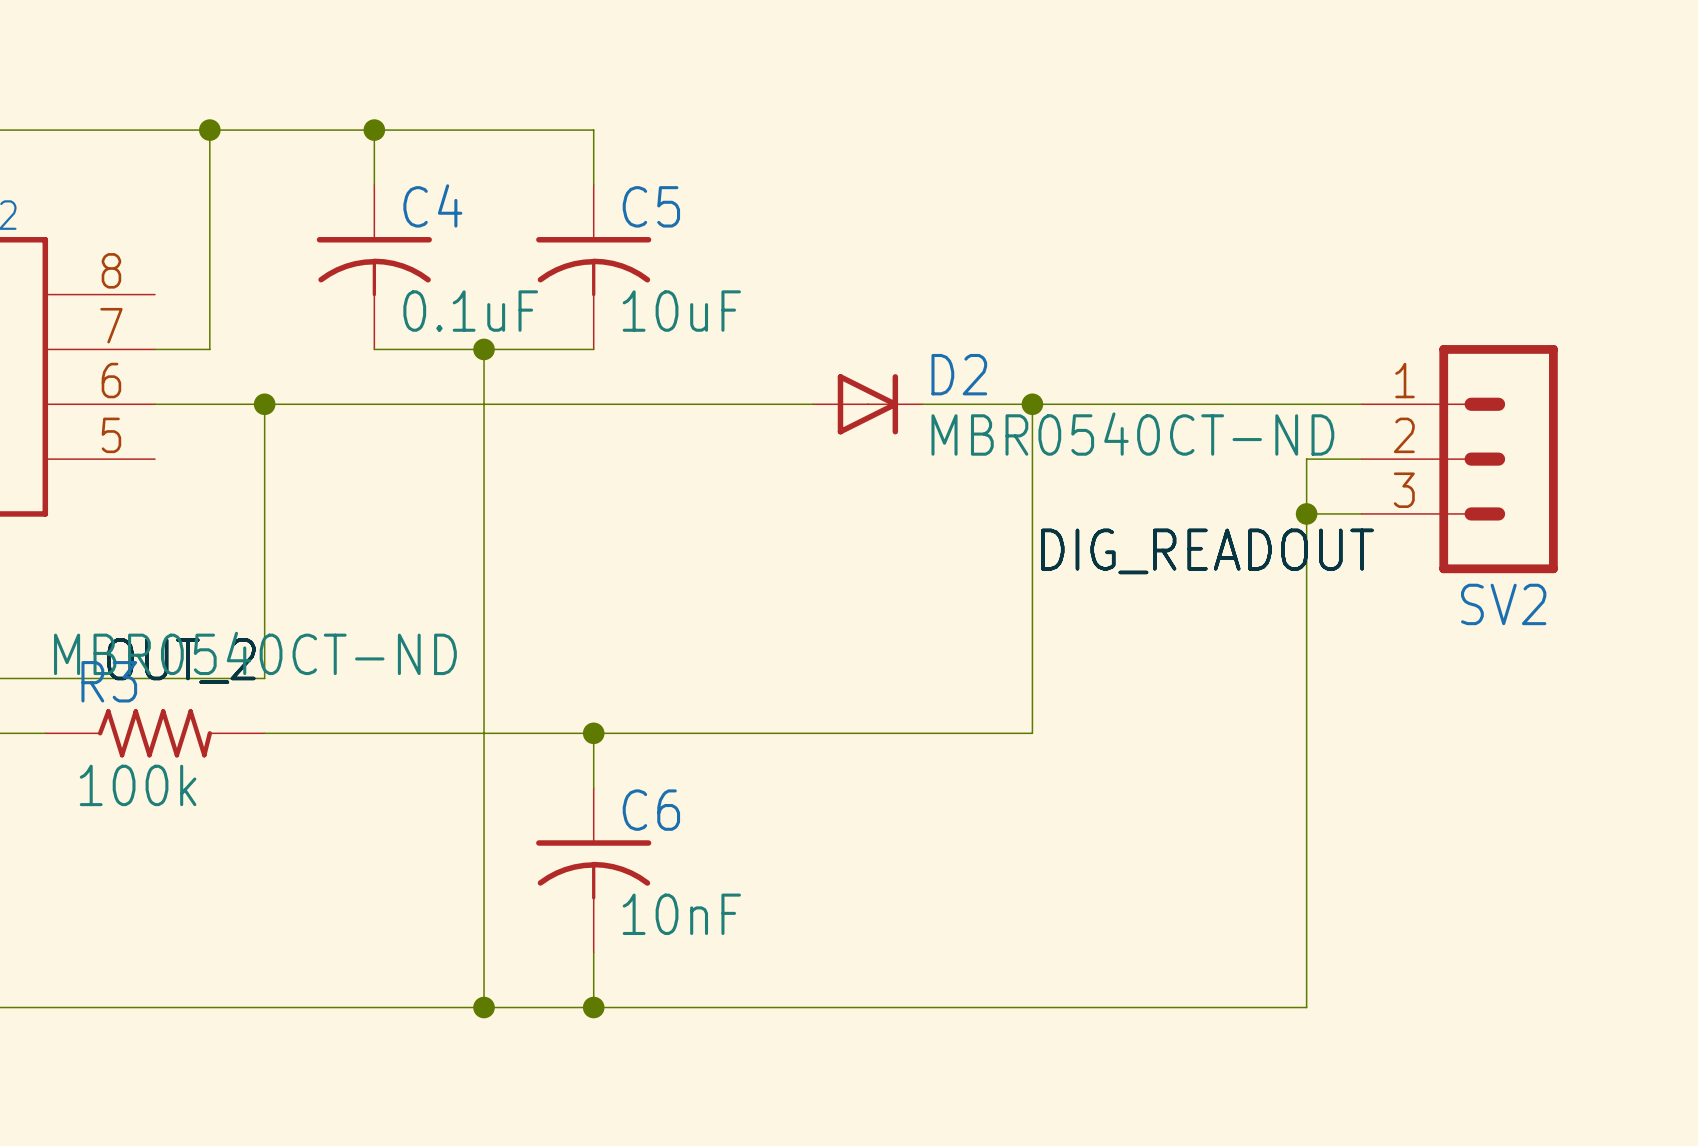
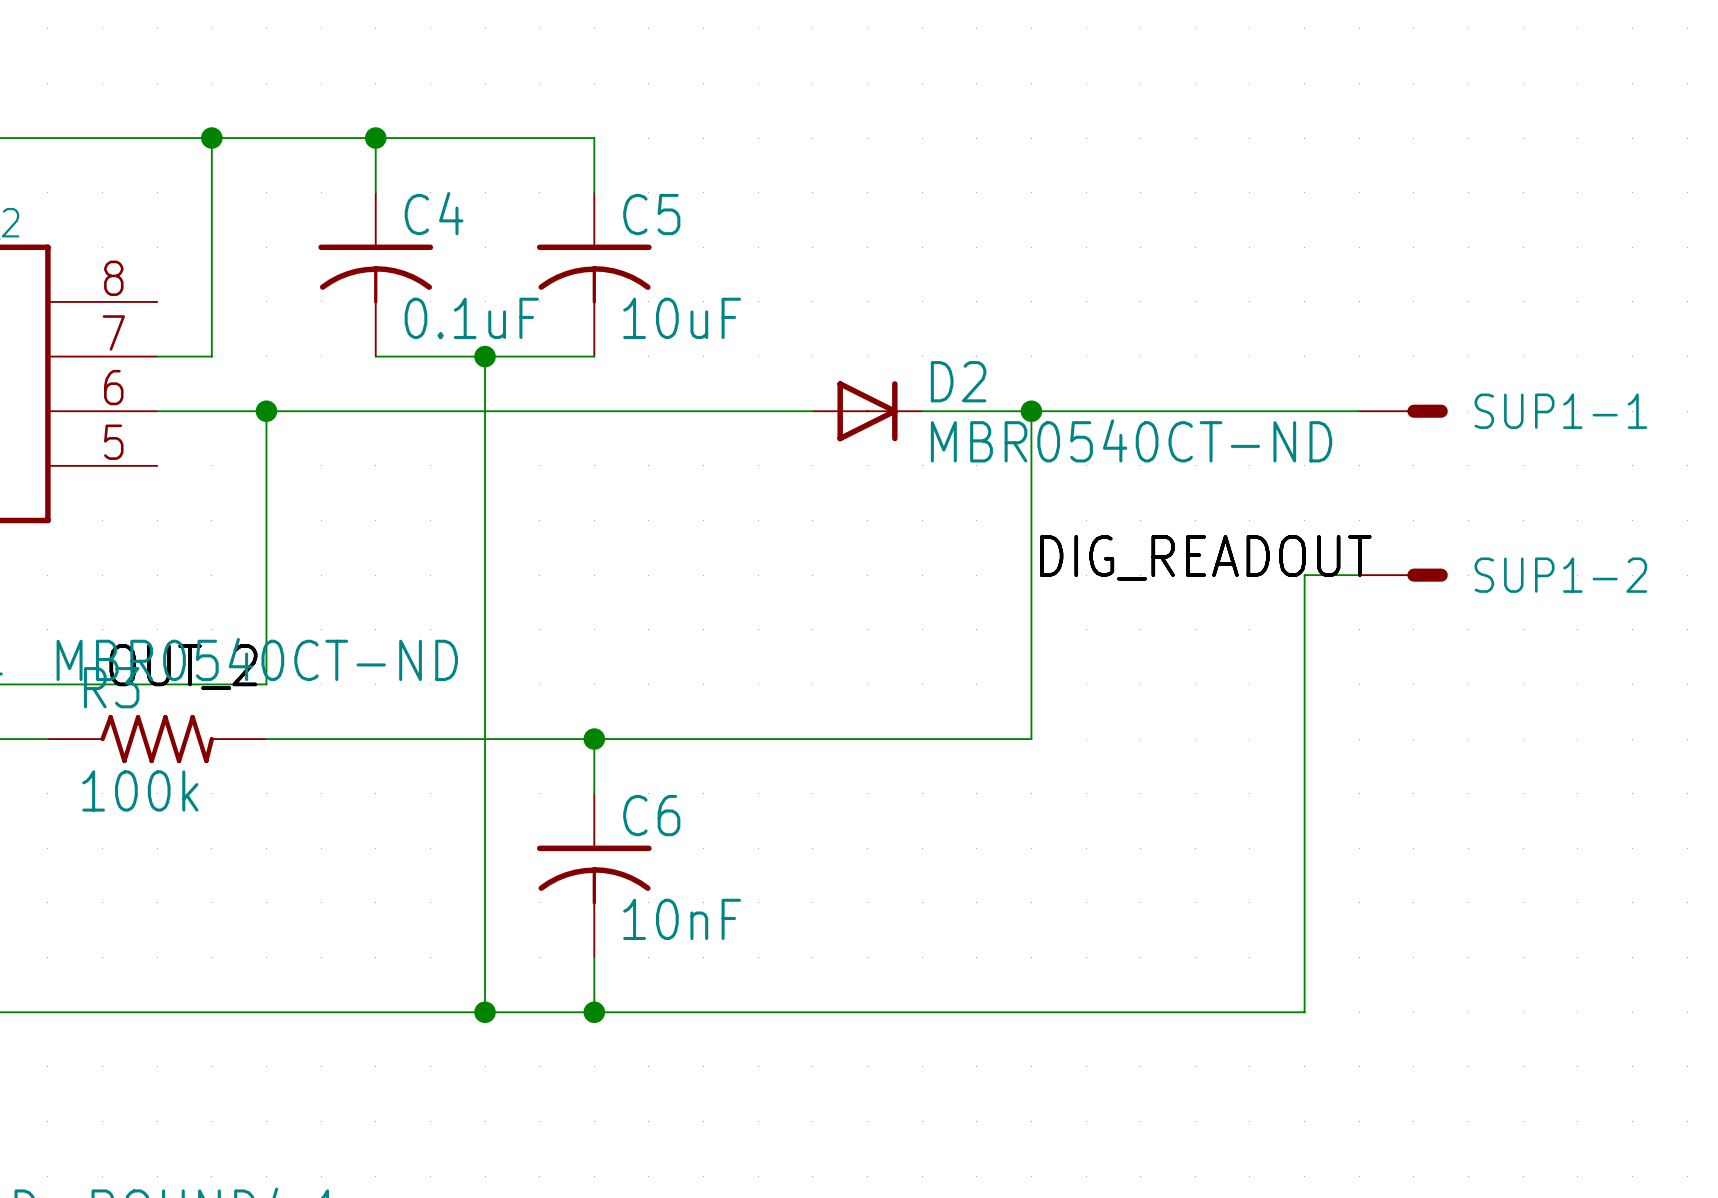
SUP1-1: none -> (1403, 411)
wire: (1361, 459) (1306, 459) (1306, 568) -> (1359, 575) (1304, 575)
SV2: (1459, 459) -> none
wire: (1306, 513) (1361, 513) -> none
junction: (1306, 513) -> none
SUP1-2: none -> (1403, 575)

